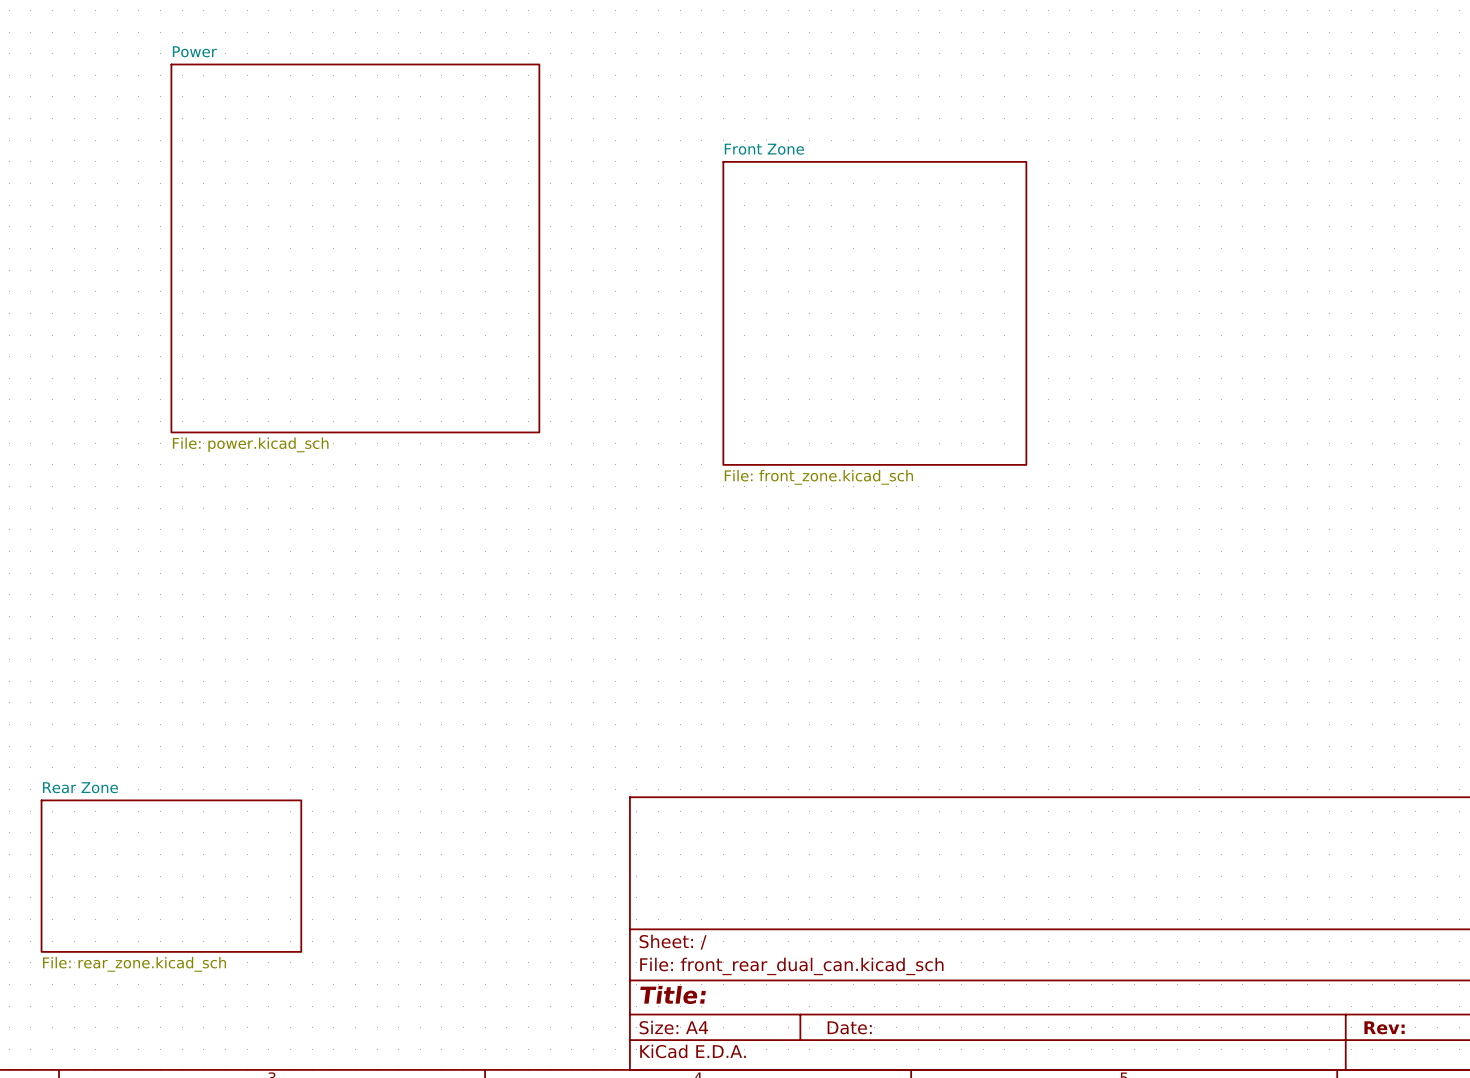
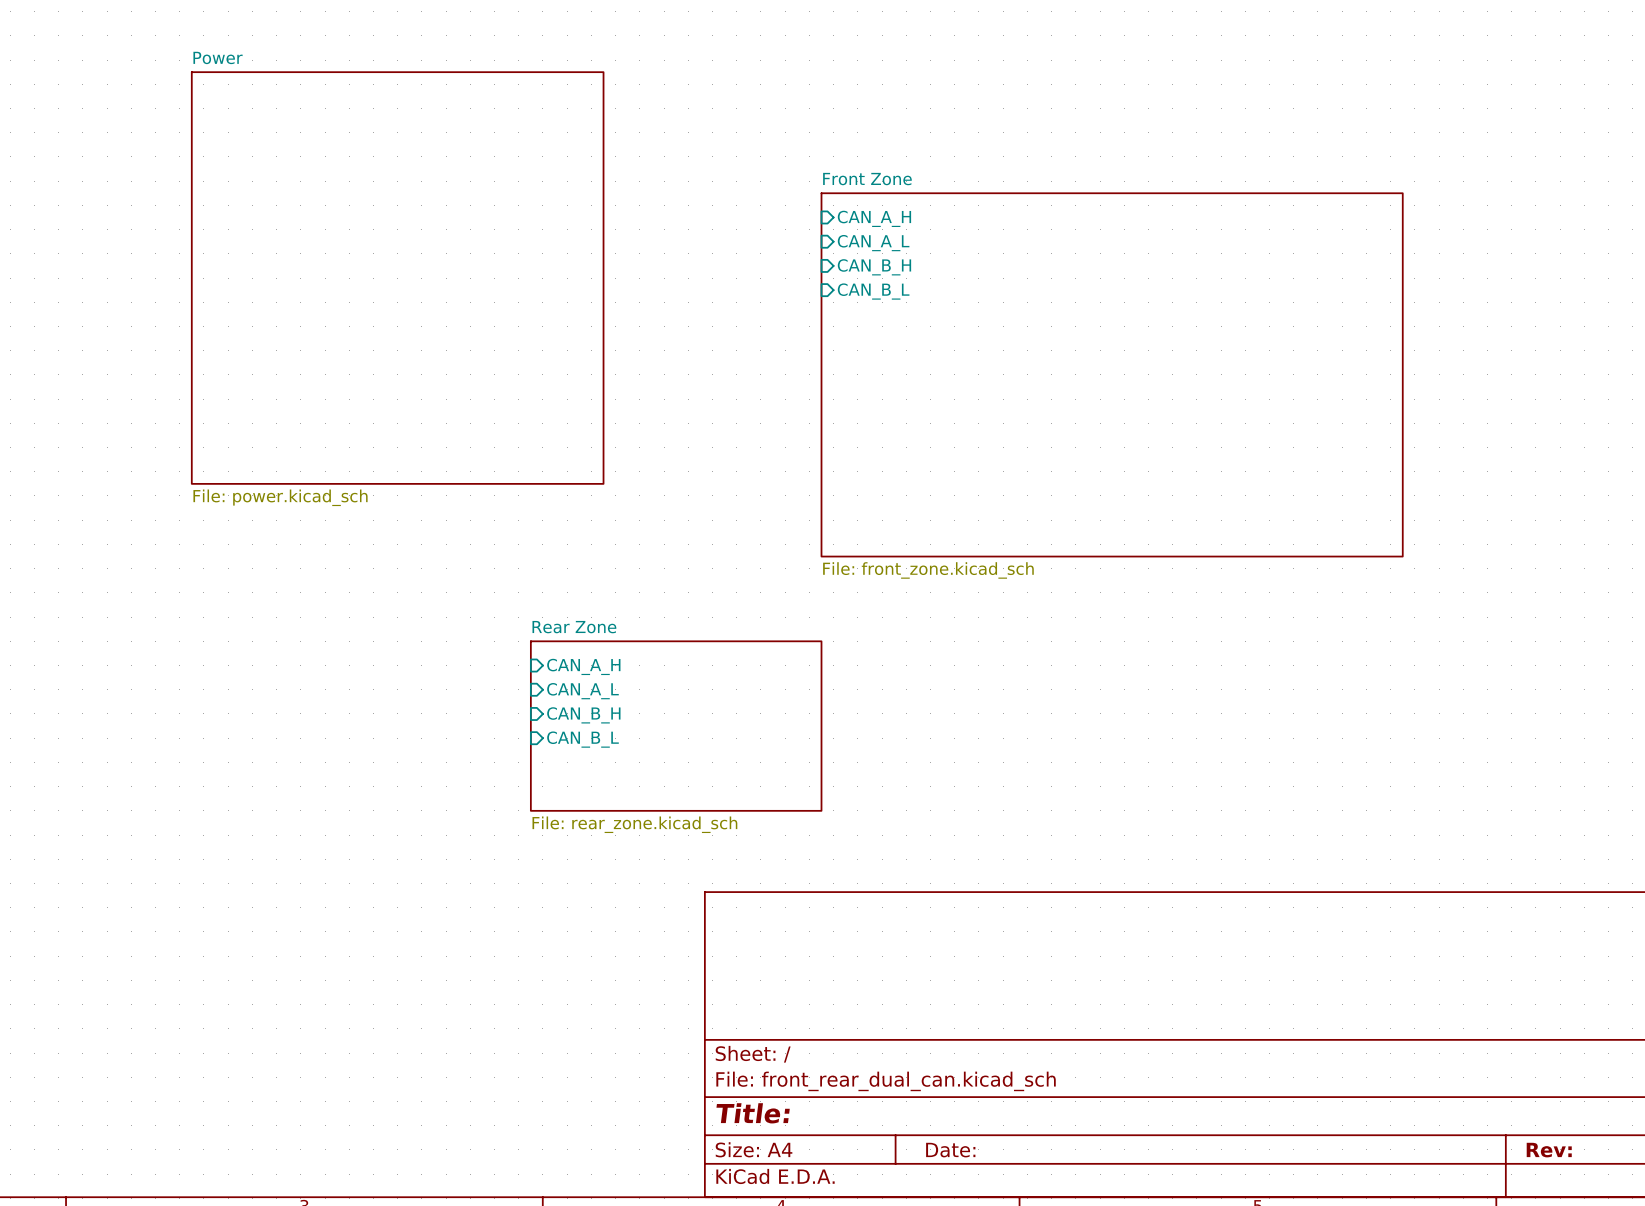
sheet pin: none -> CAN_A_H (874, 218)
sheet pin: none -> CAN_A_L (873, 243)
sheet pin: none -> CAN_B_H (874, 267)
sheet pin: none -> CAN_B_L (873, 291)
sheet Front Zone: File: front_zone.kicad_sch (874, 313) -> none
sheet Front Zone: none -> File: front_zone.kicad_sch (1112, 374)
sheet pin: none -> CAN_A_H (583, 666)
sheet pin: none -> CAN_A_L (582, 691)
sheet pin: none -> CAN_B_H (583, 715)
sheet Rear Zone: none -> File: rear_zone.kicad_sch (676, 726)
sheet pin: none -> CAN_B_L (582, 739)
sheet Rear Zone: File: rear_zone.kicad_sch (171, 876) -> none

